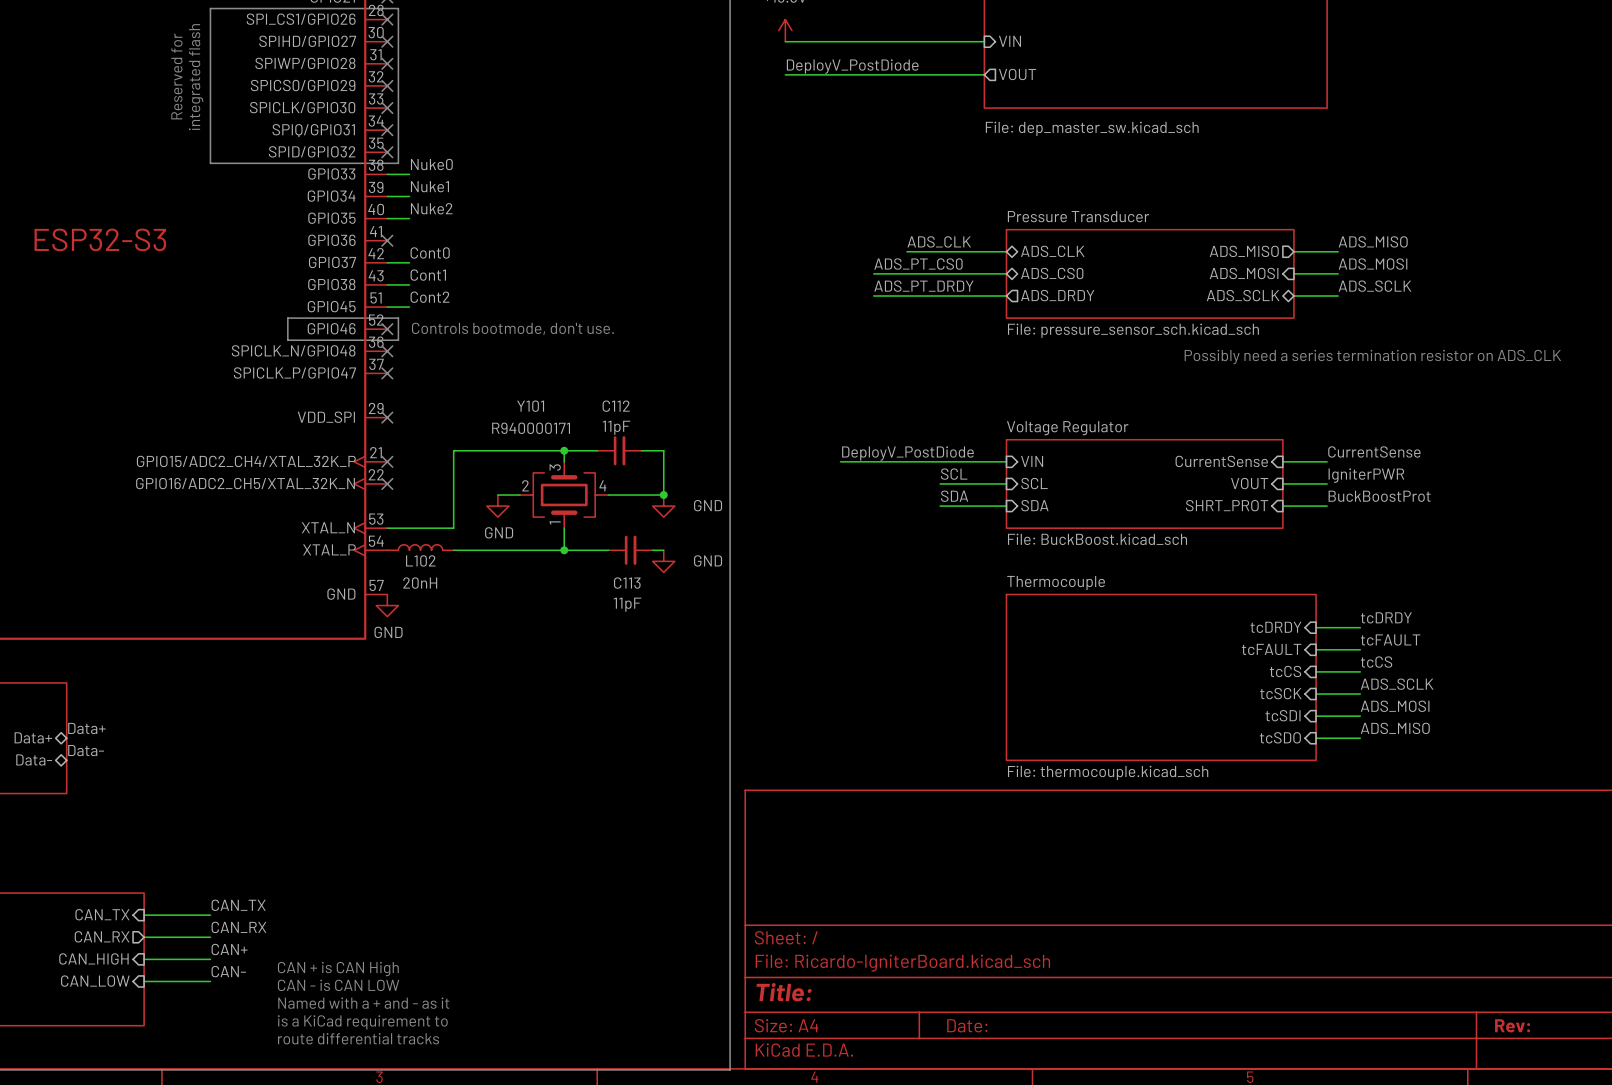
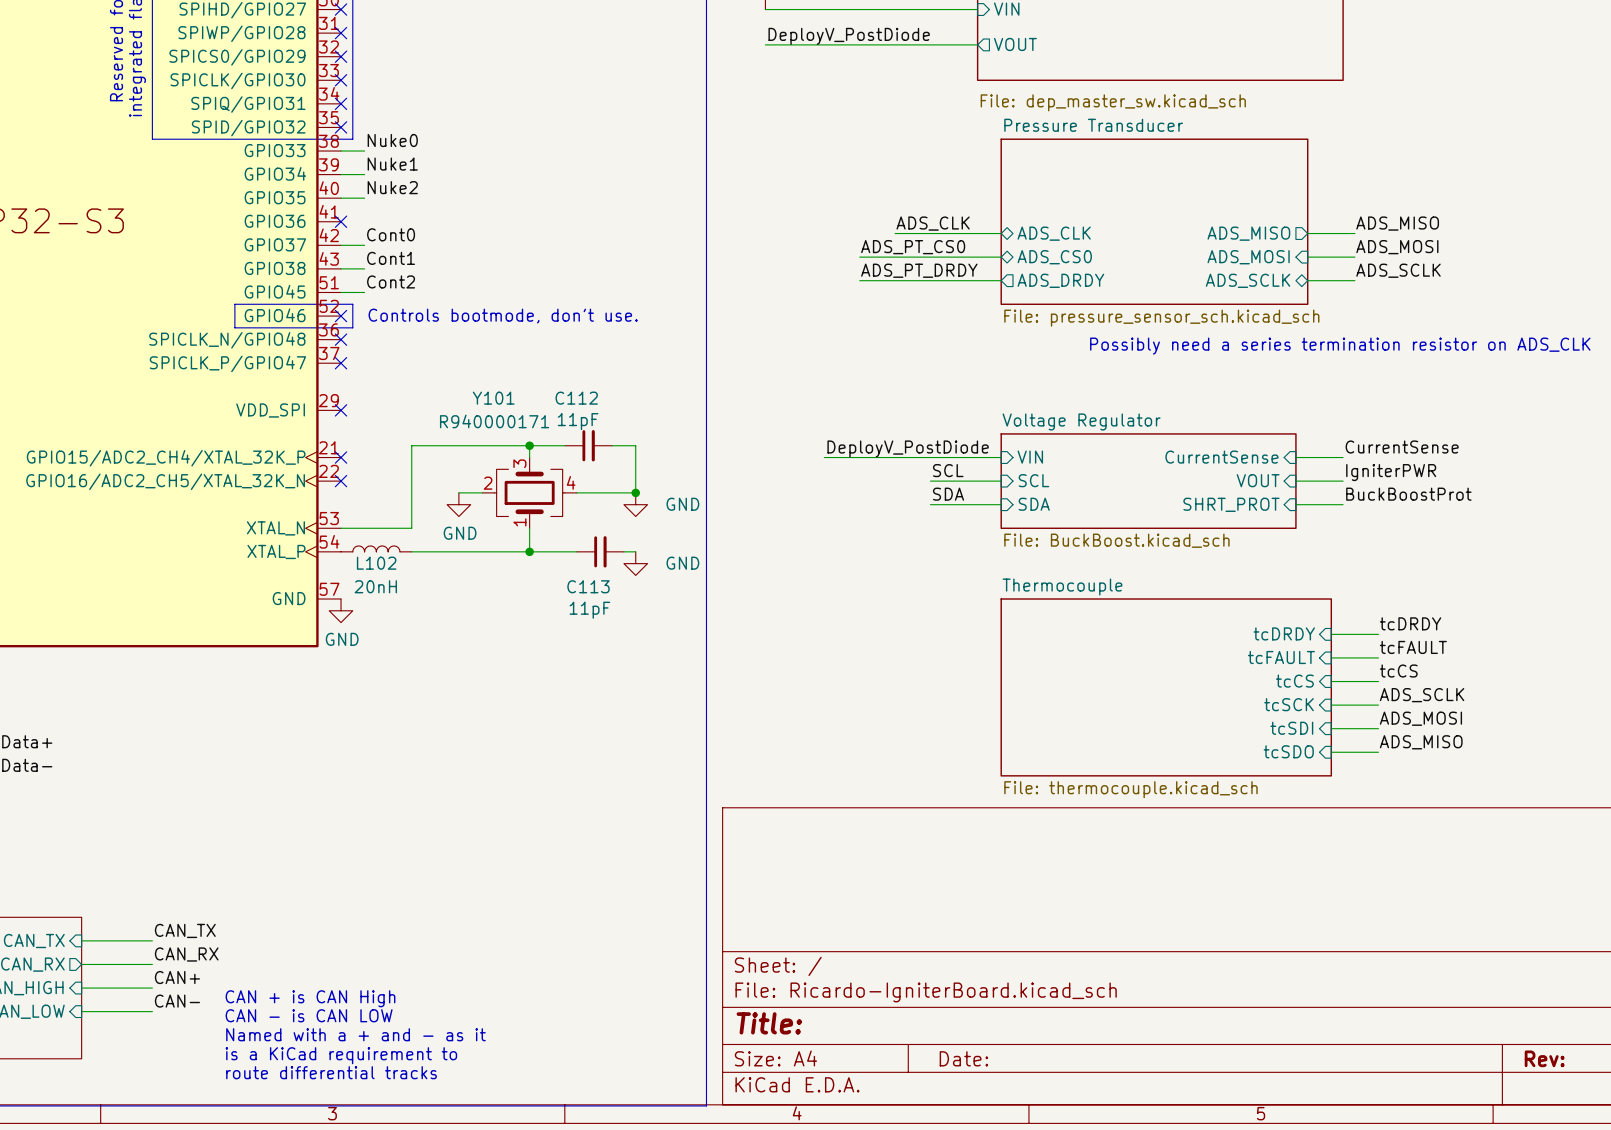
sheet Pressure Transducer: none -> File: pressure_sensor_sch.kicad_sch (1154, 221)
sheet Pressure Transducer: File: pressure_sensor_sch.kicad_sch (1150, 273) -> none

